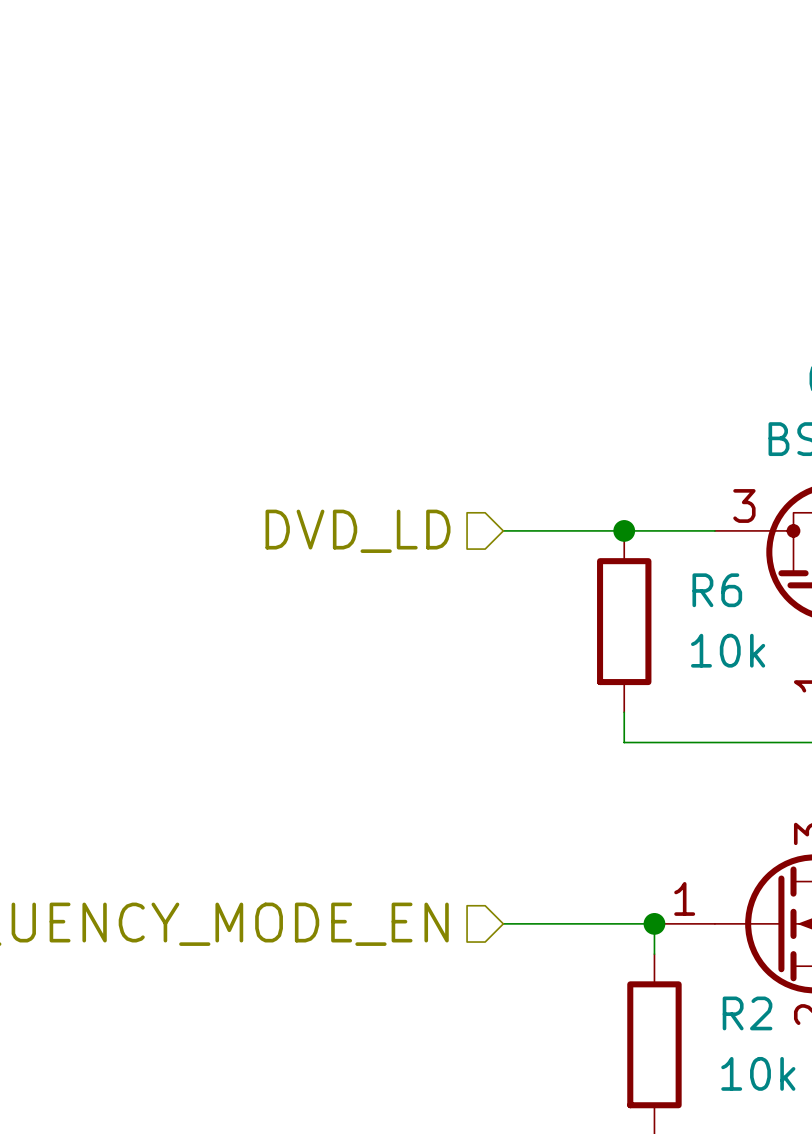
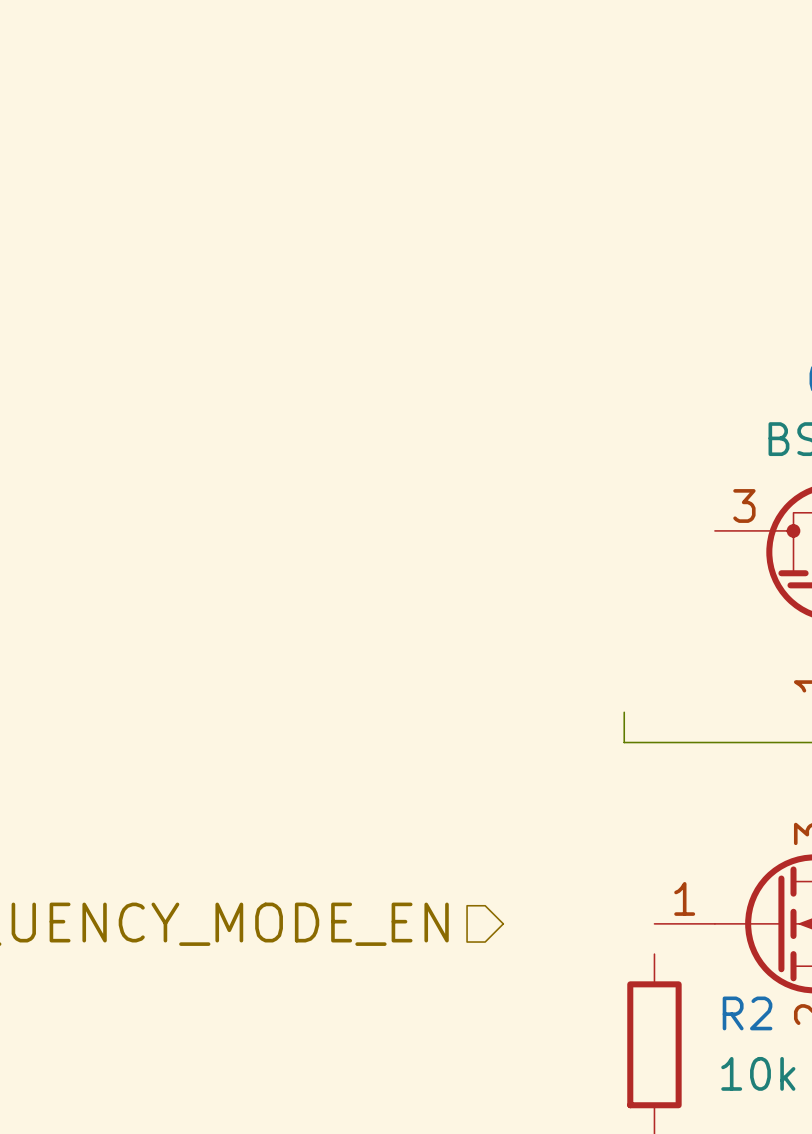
wire: (503, 530) (714, 530) -> none
junction: (624, 530) -> none
hierarchical label: DVD_LD (358, 531) -> none
R6: 10k (624, 621) -> none
wire: (503, 923) (654, 923) (654, 954) -> none
junction: (654, 923) -> none

